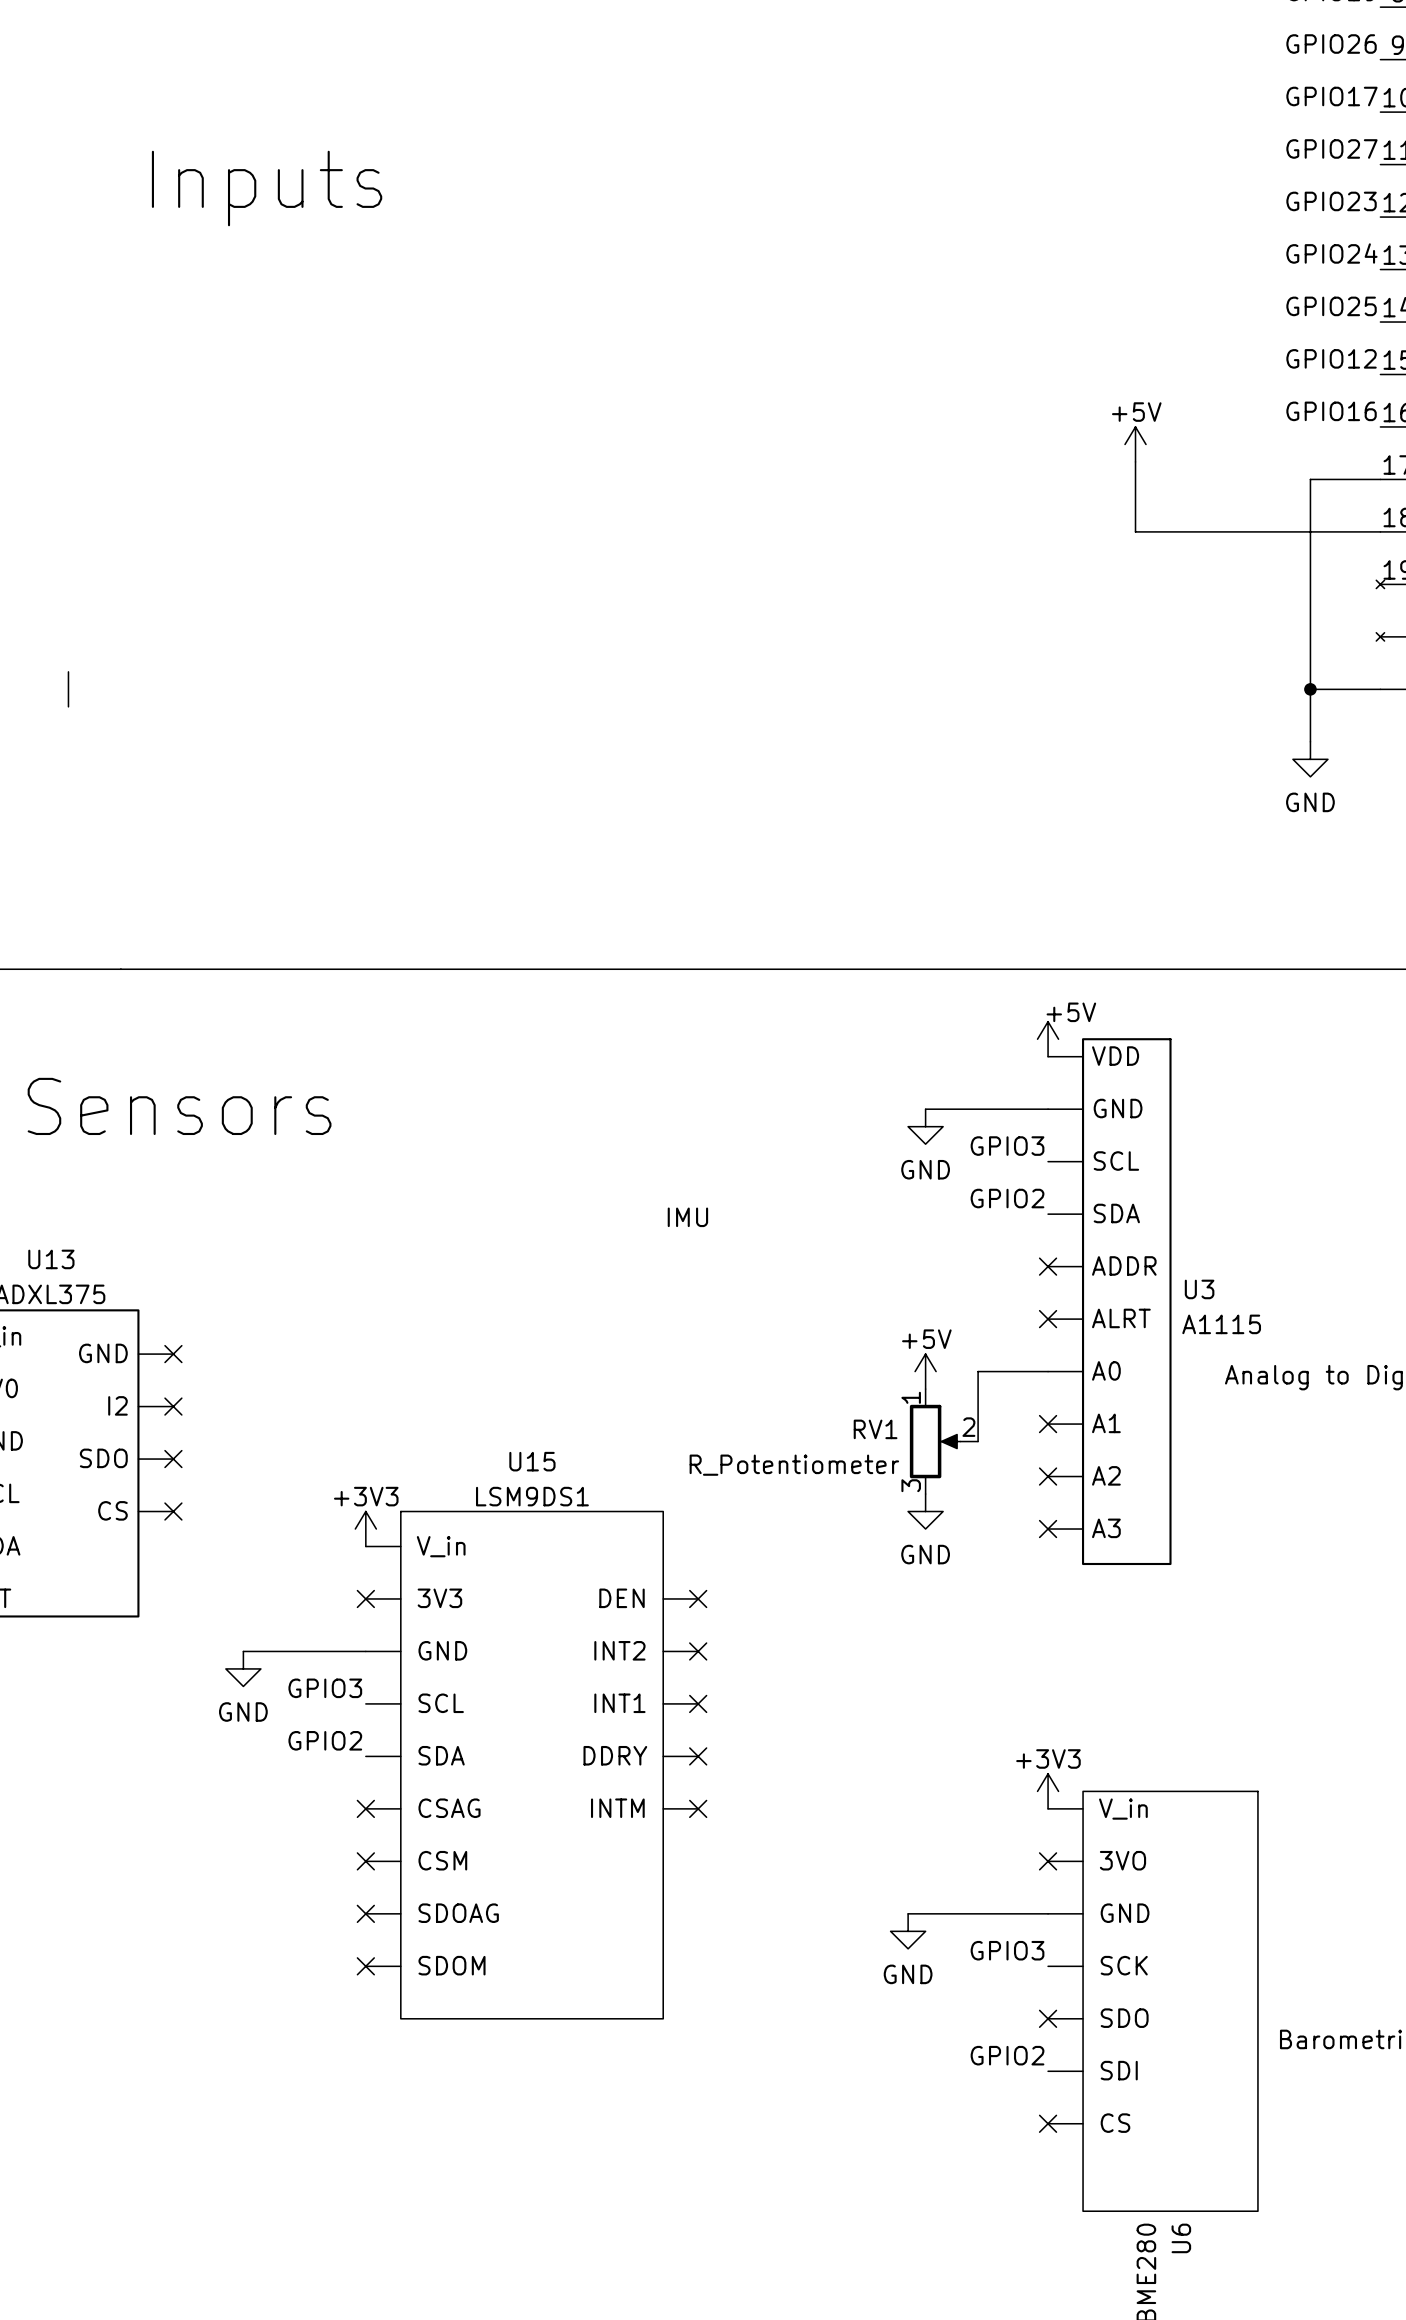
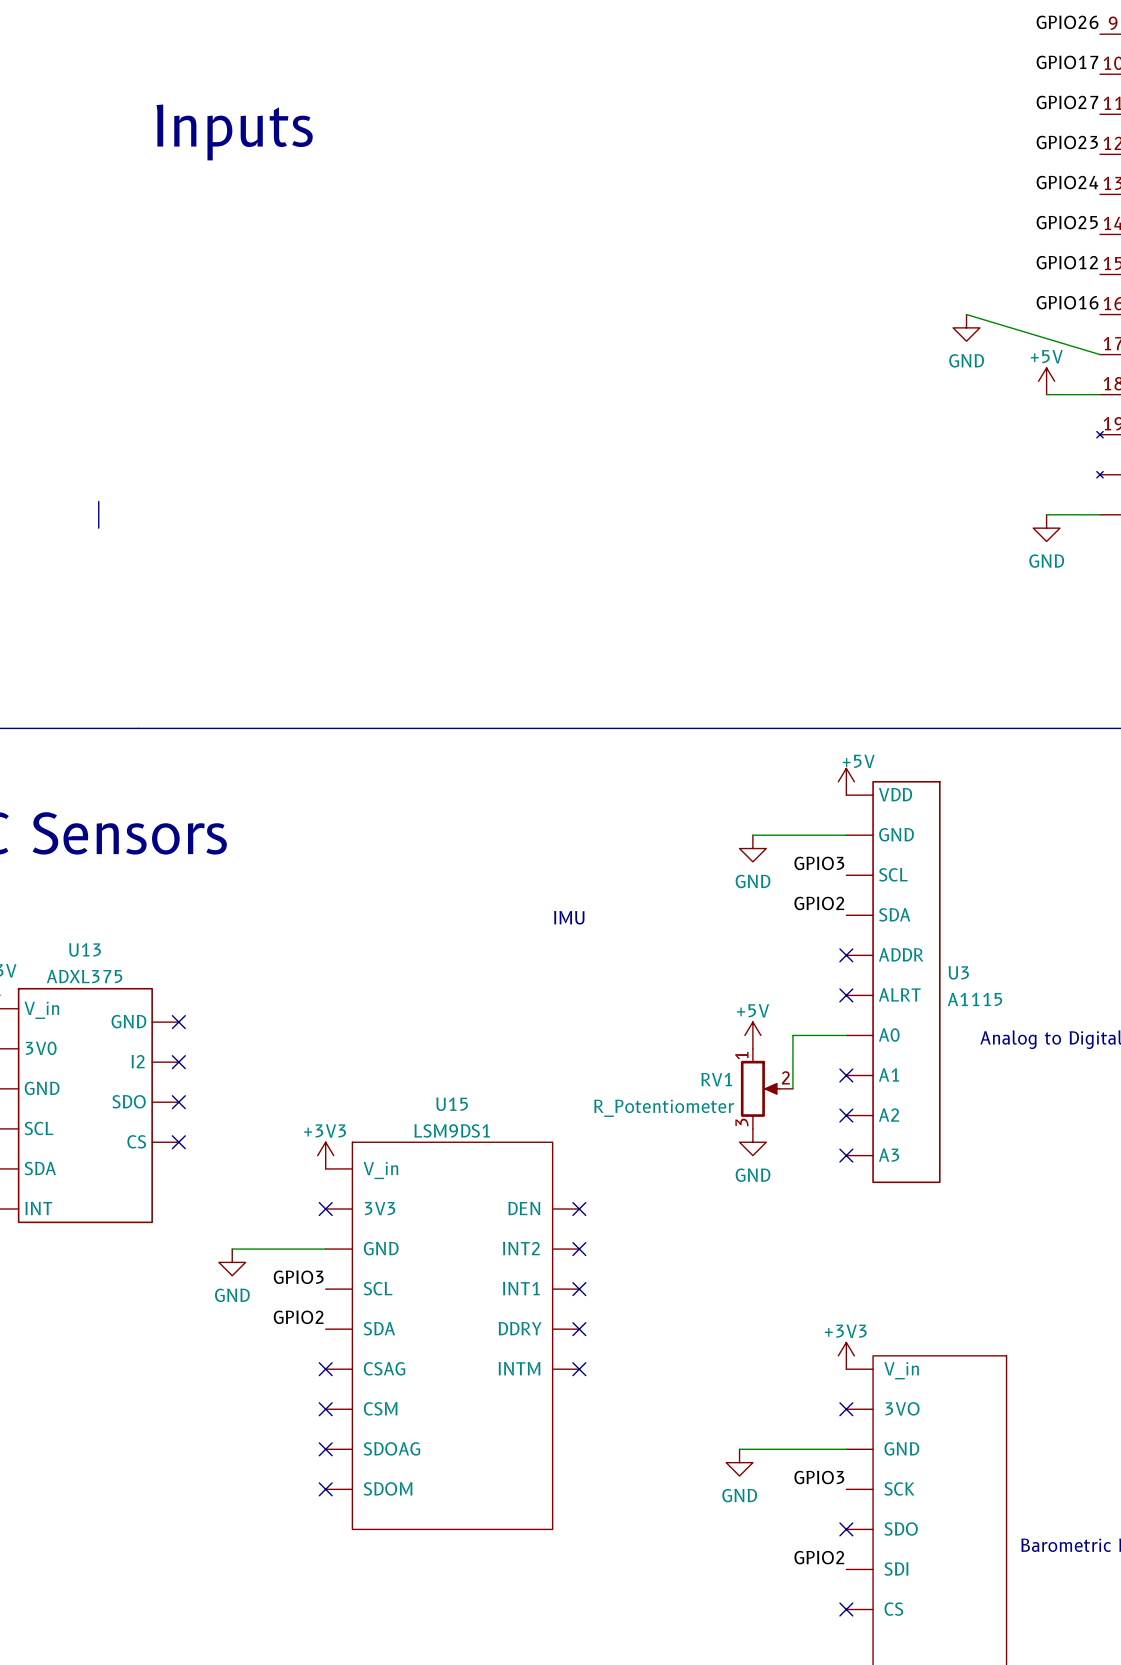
power symbol position: +5V (1135, 444) -> +5V (1046, 381)
power symbol: none -> GND (966, 327)
wire: (1135, 461) (1135, 531) (1310, 531) -> none
wire: (1380, 479) (1310, 479) (1310, 741) -> (1100, 354) (966, 314)
junction: (1310, 689) -> none
power symbol position: GND (1310, 759) -> GND (1046, 528)

